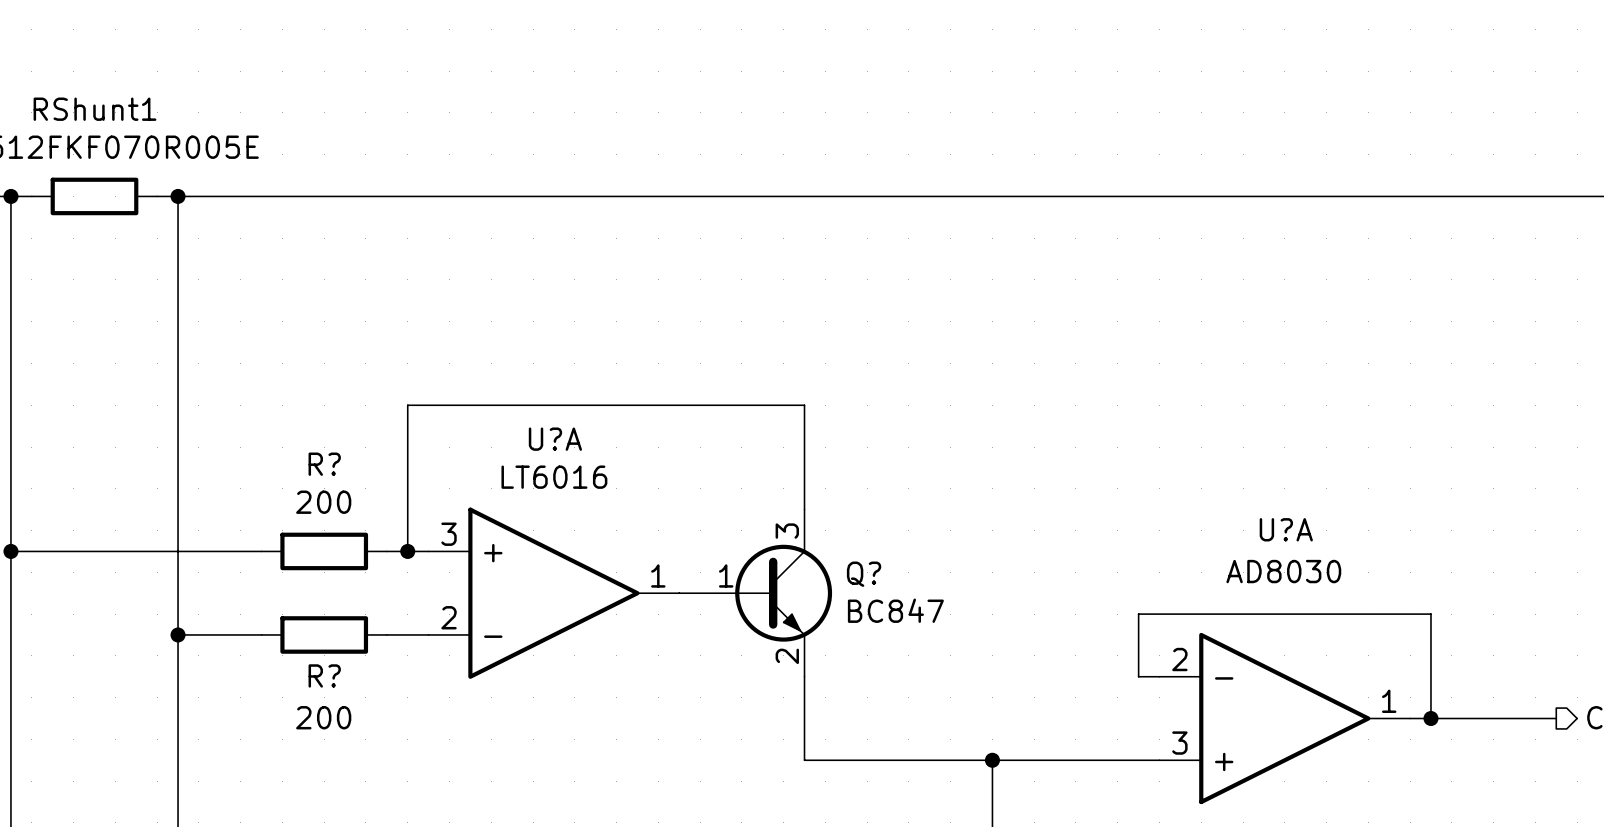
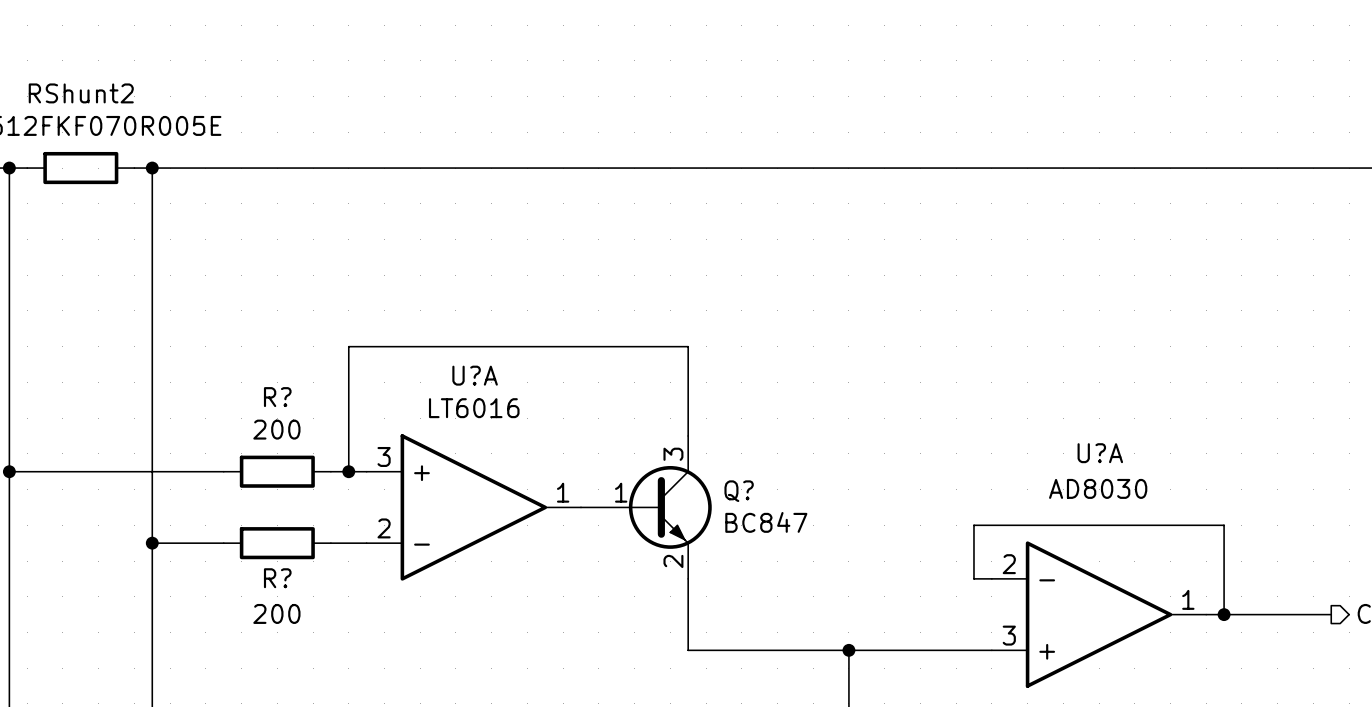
RShunt1 name: RShunt1 (94, 109) -> RShunt2 (81, 93)

